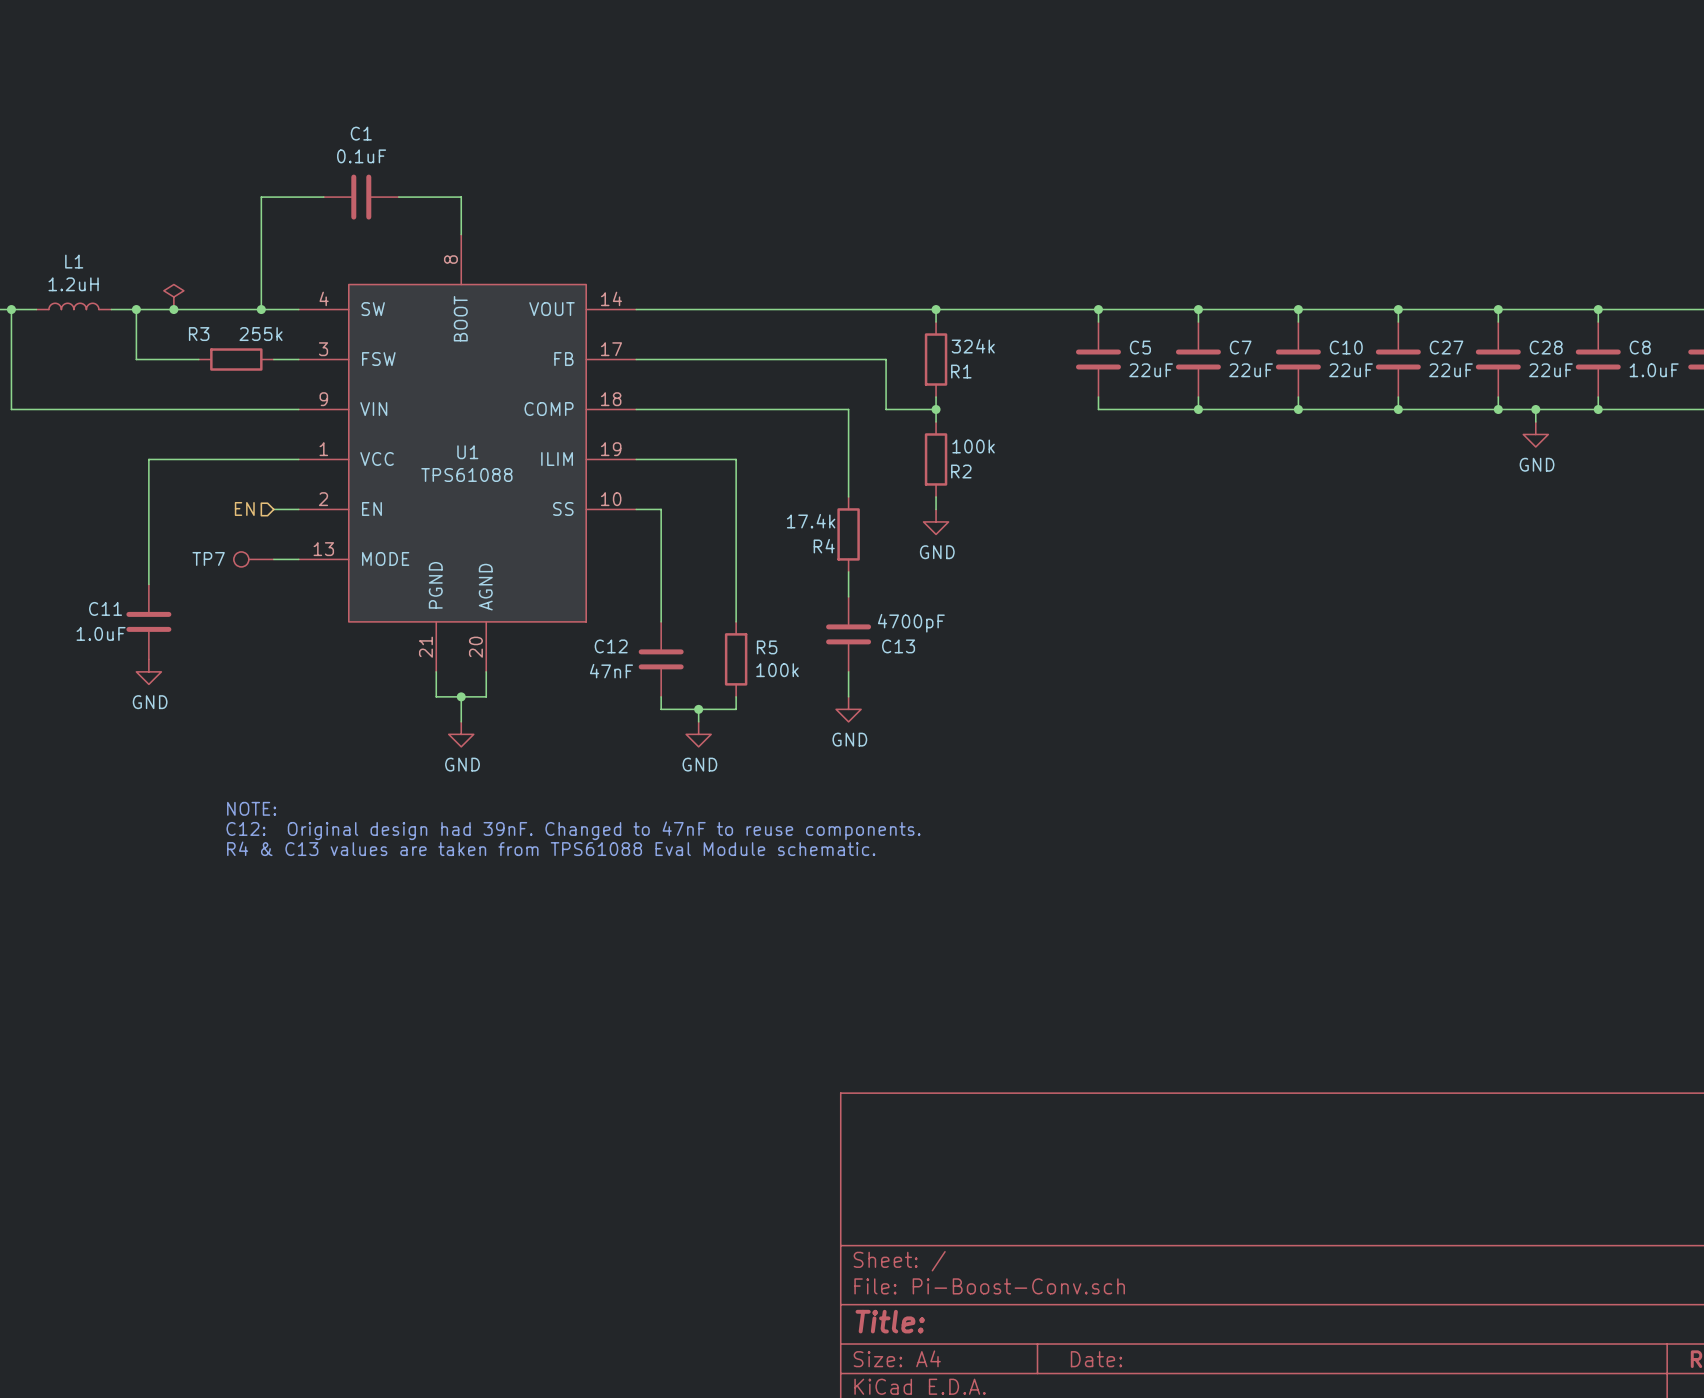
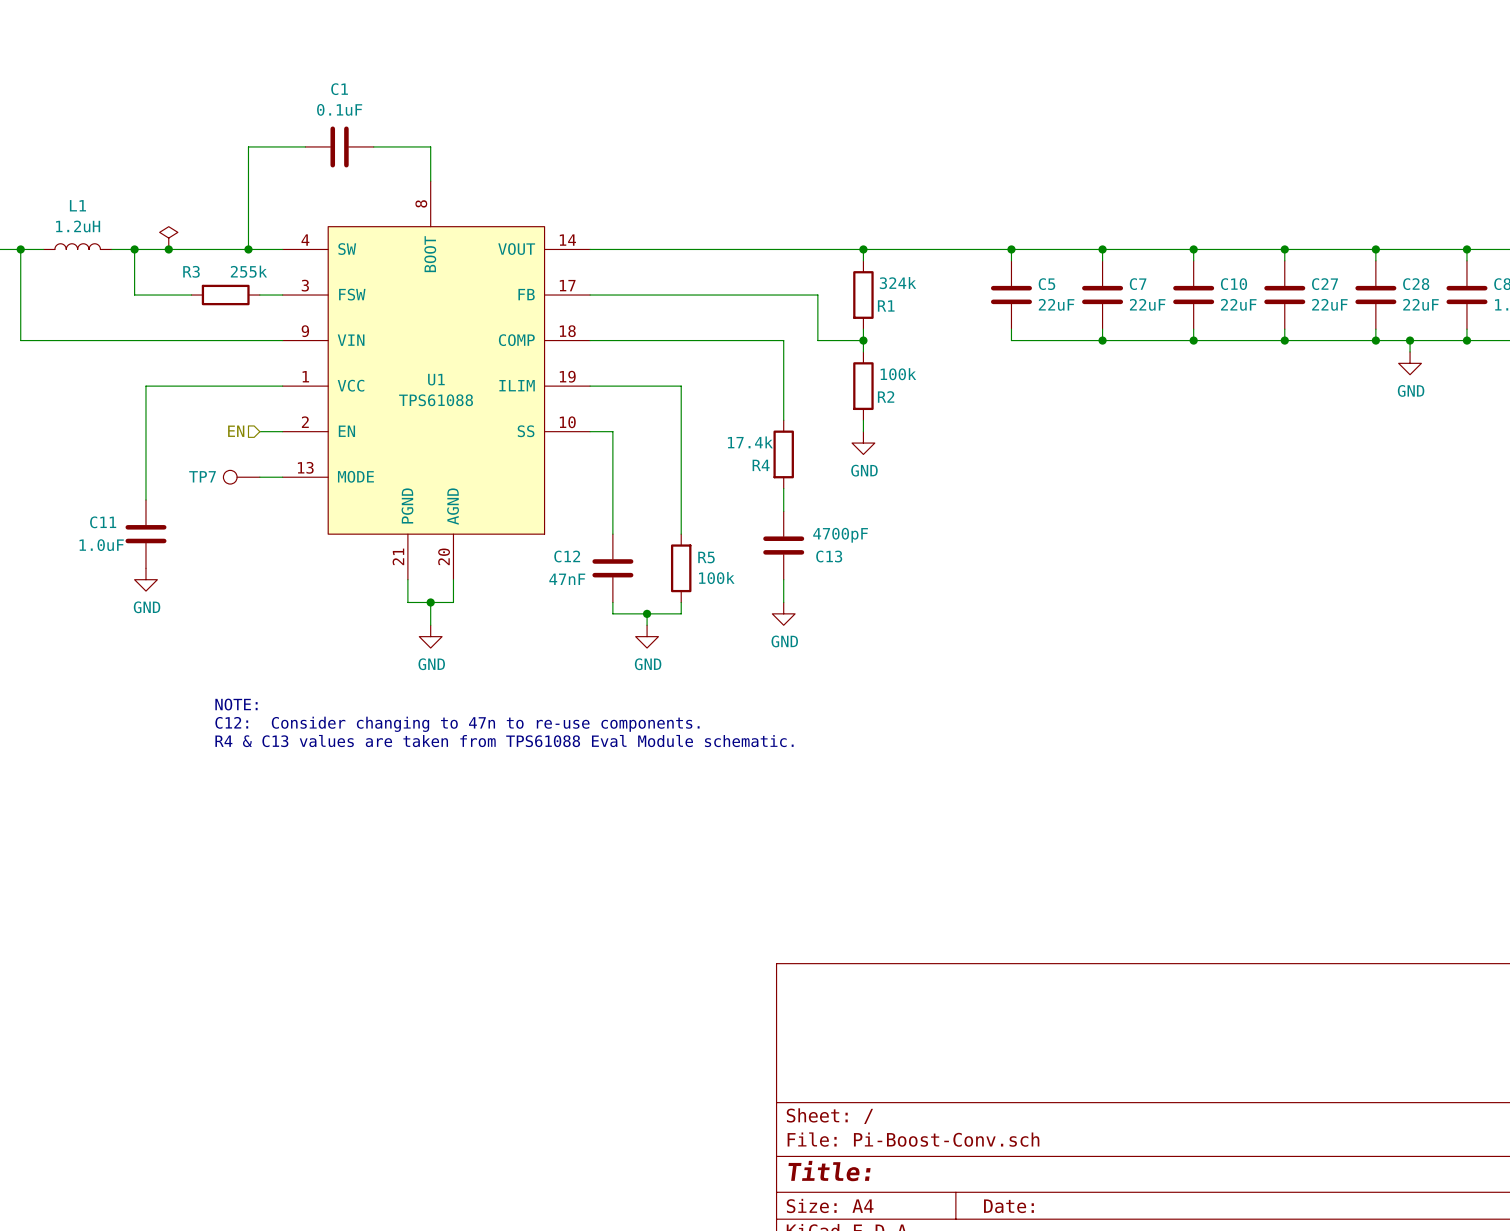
text: C12: Original design had 39nF. Changed to 47nF to reuse components. (573, 830) -> C12: Consider changing to 47n to re-use components. (457, 724)

